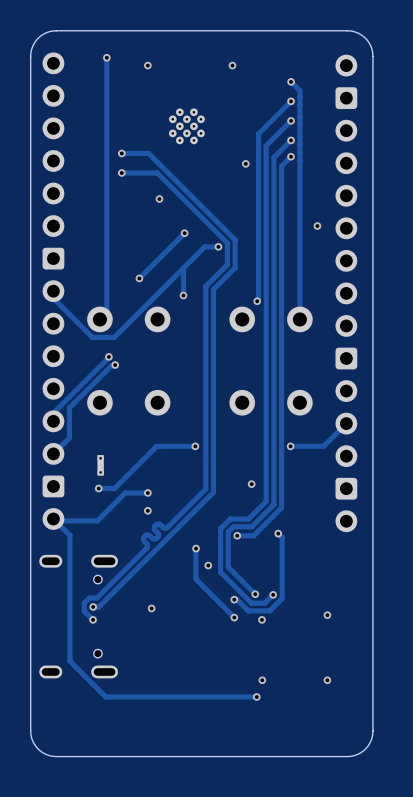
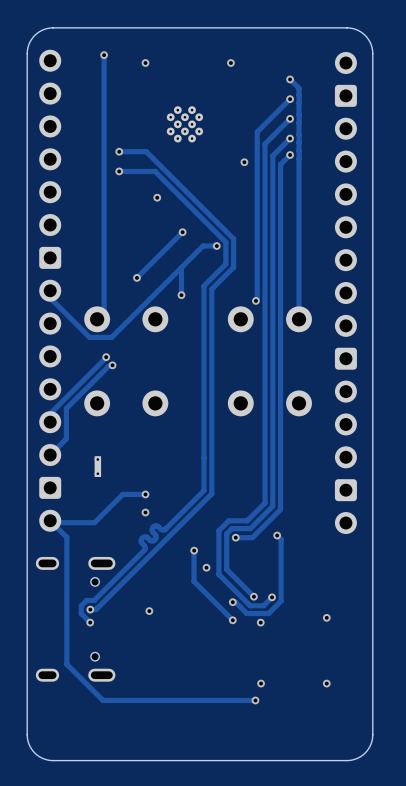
via: (317, 226) -> none
track: (346, 423) (323, 446) (290, 446) -> none
track: (195, 446) (156, 446) (114, 488) (98, 488) -> none
via: (195, 446) -> none
via: (290, 446) -> none
via: (251, 484) -> none
via: (98, 488) -> none

